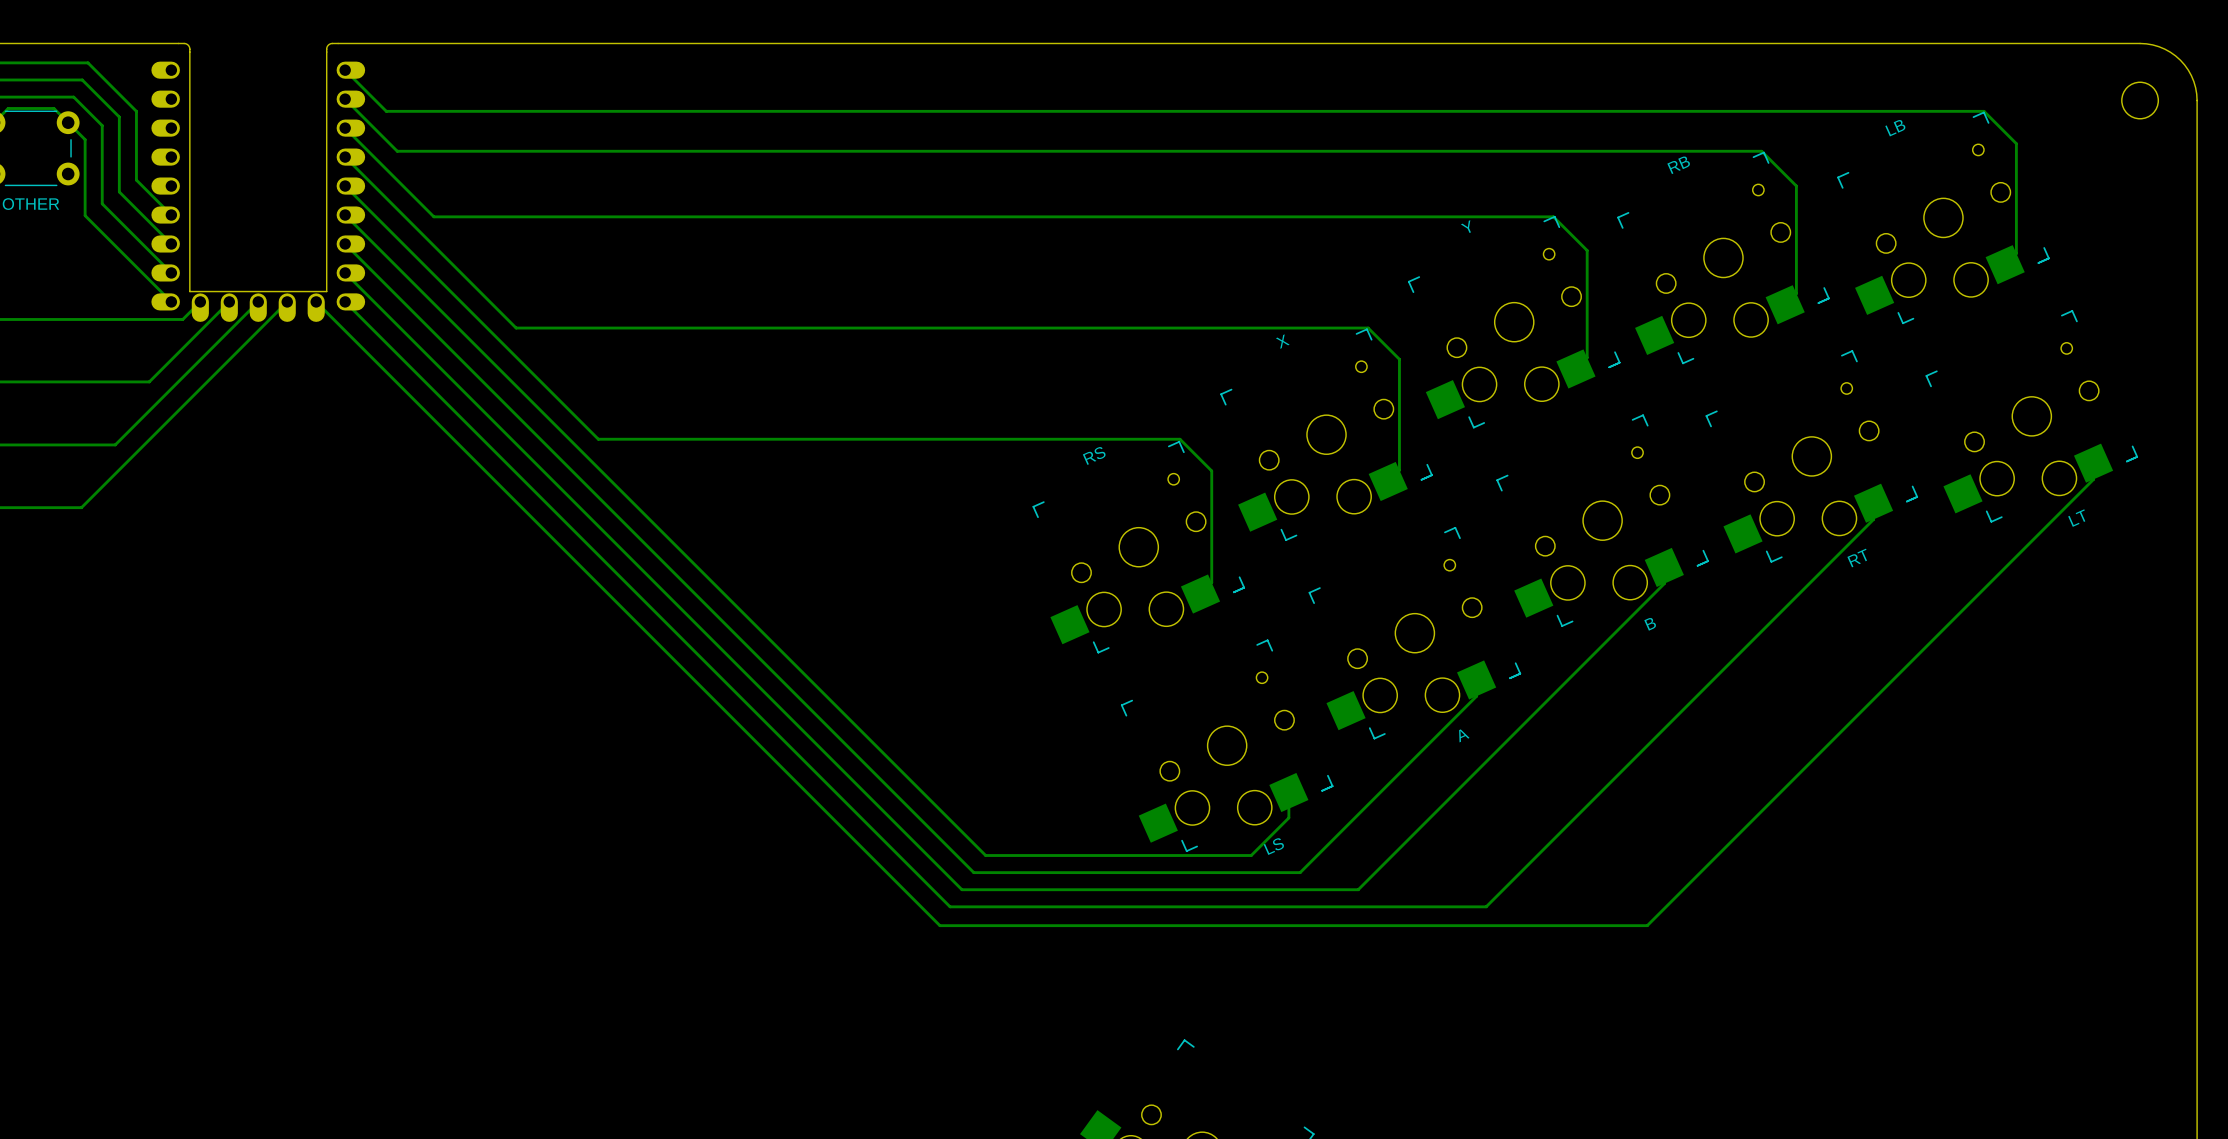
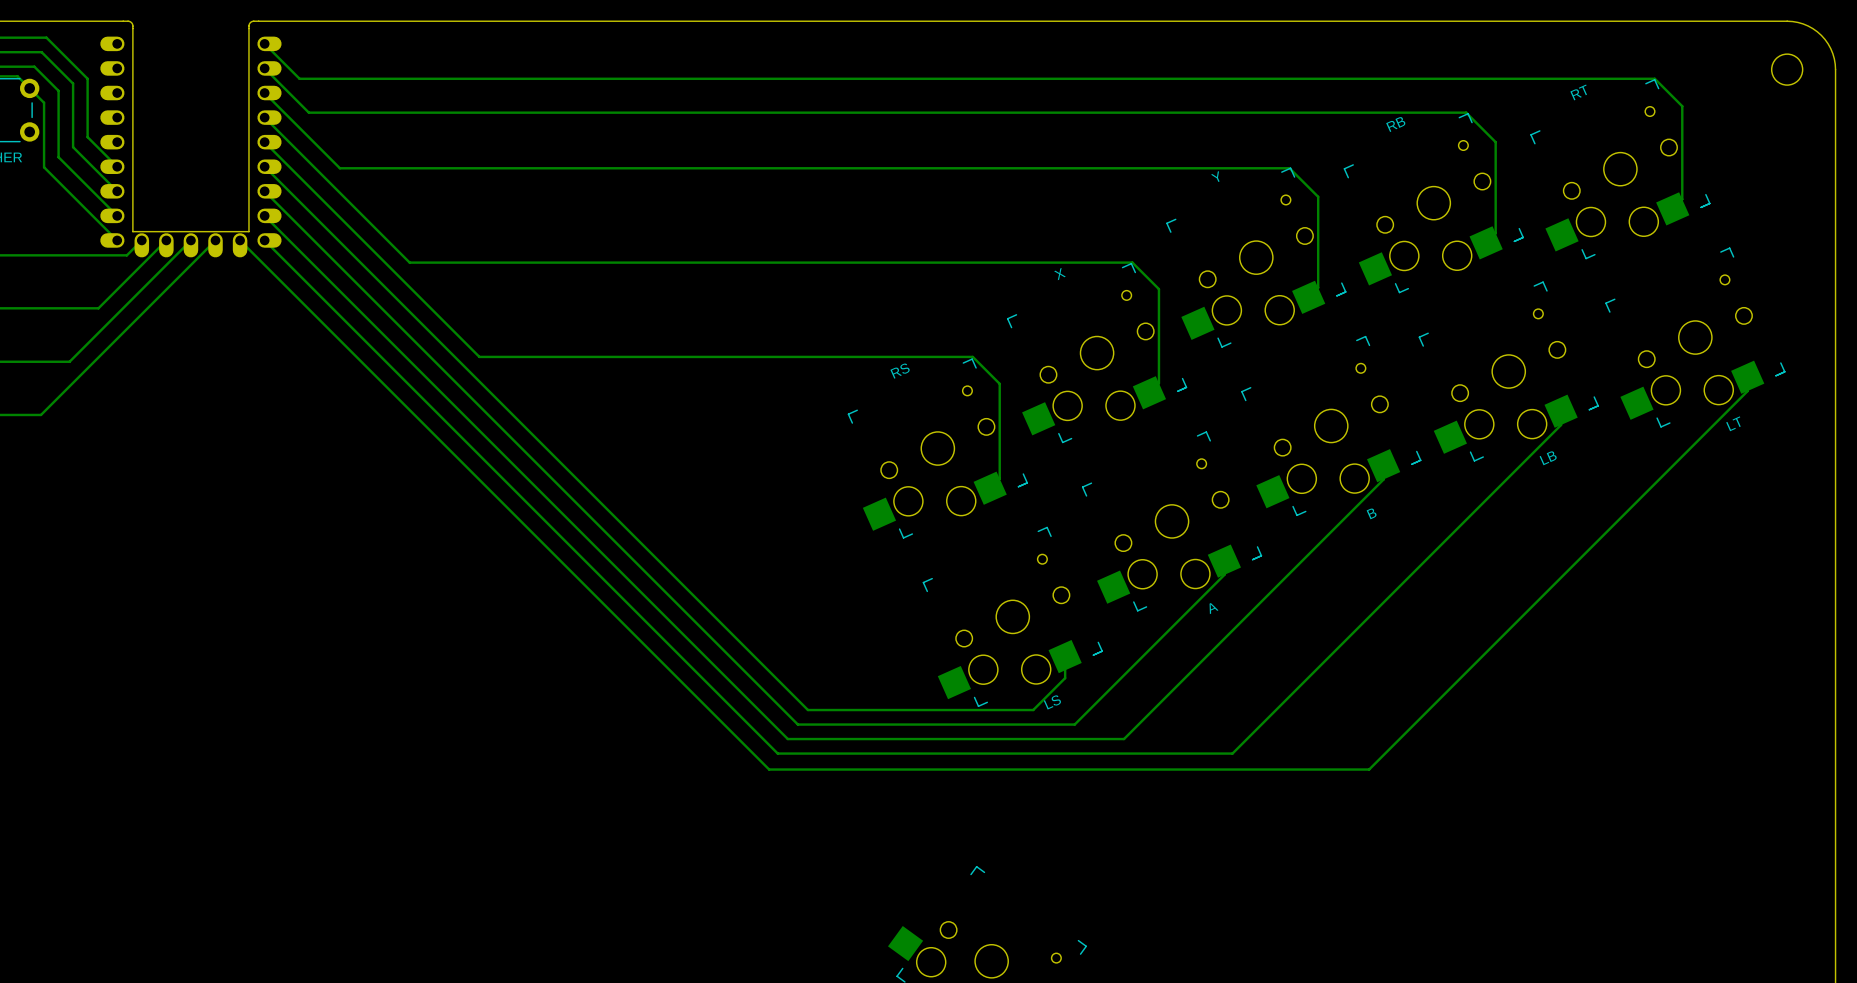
text: LB (1895, 127) -> RT (1578, 92)
text: RT (1857, 558) -> LB (1548, 457)

